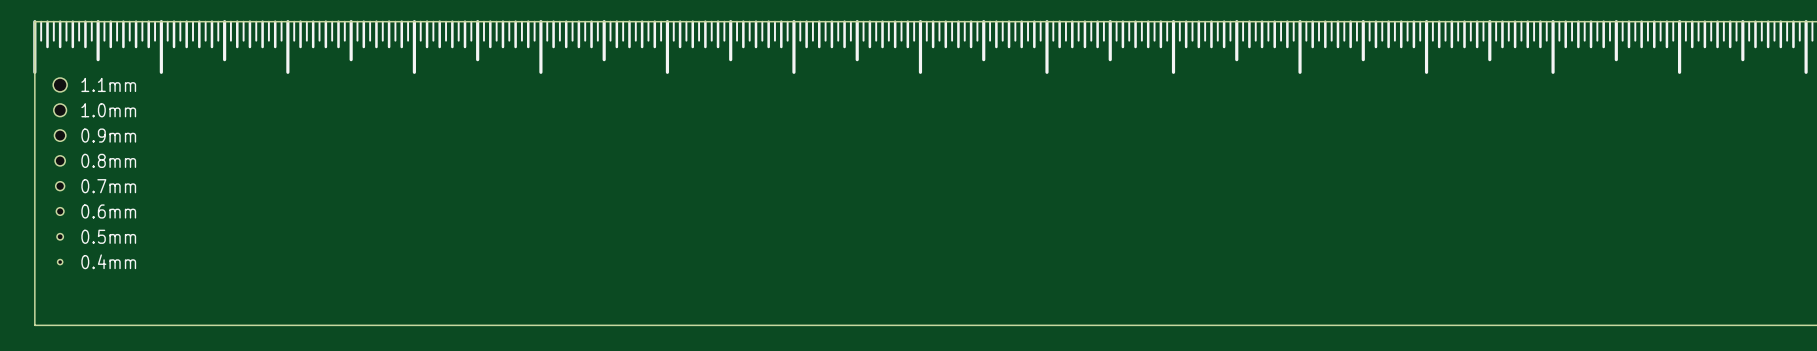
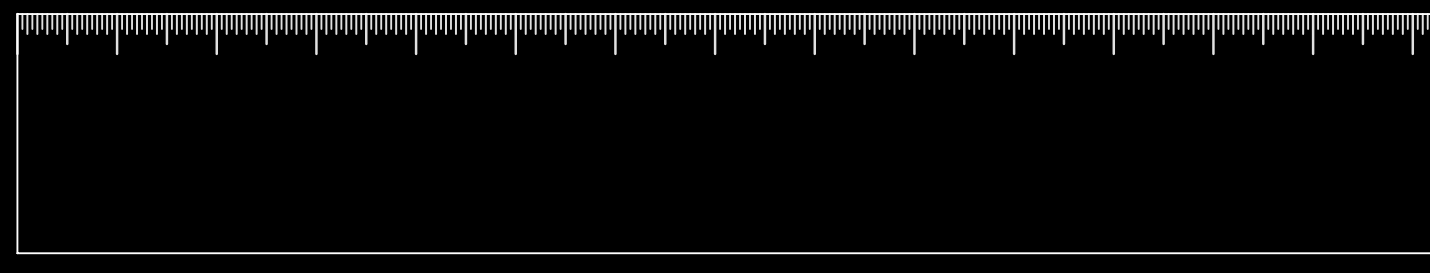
hole: (60, 84) -> none
text: 1.1mm (108, 84) -> none
hole: (60, 110) -> none
text: 1.0mm (108, 110) -> none
hole: (60, 135) -> none
text: 0.9mm (108, 135) -> none
hole: (60, 160) -> none
text: 0.8mm (108, 160) -> none
hole: (60, 186) -> none
text: 0.7mm (108, 186) -> none
hole: (60, 211) -> none
text: 0.6mm (108, 211) -> none
hole: (60, 236) -> none
text: 0.5mm (108, 236) -> none
text: 0.4mm (108, 261) -> none
hole: (60, 262) -> none

